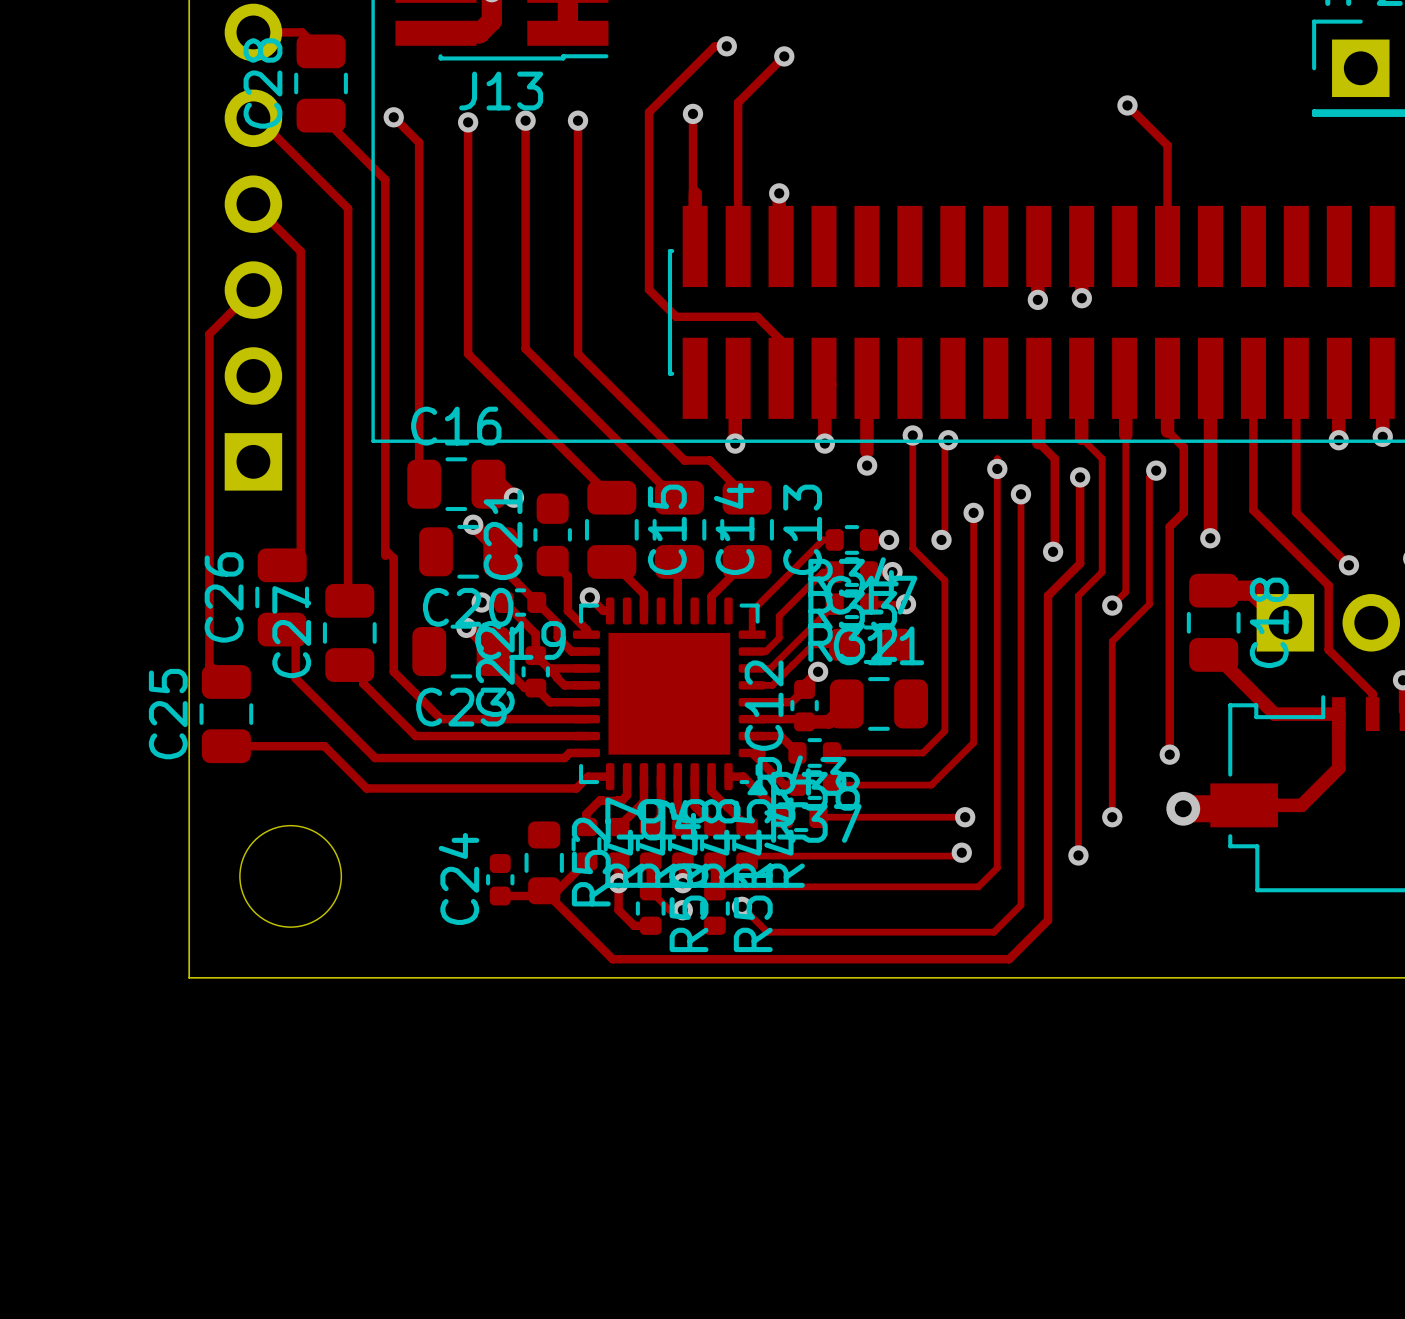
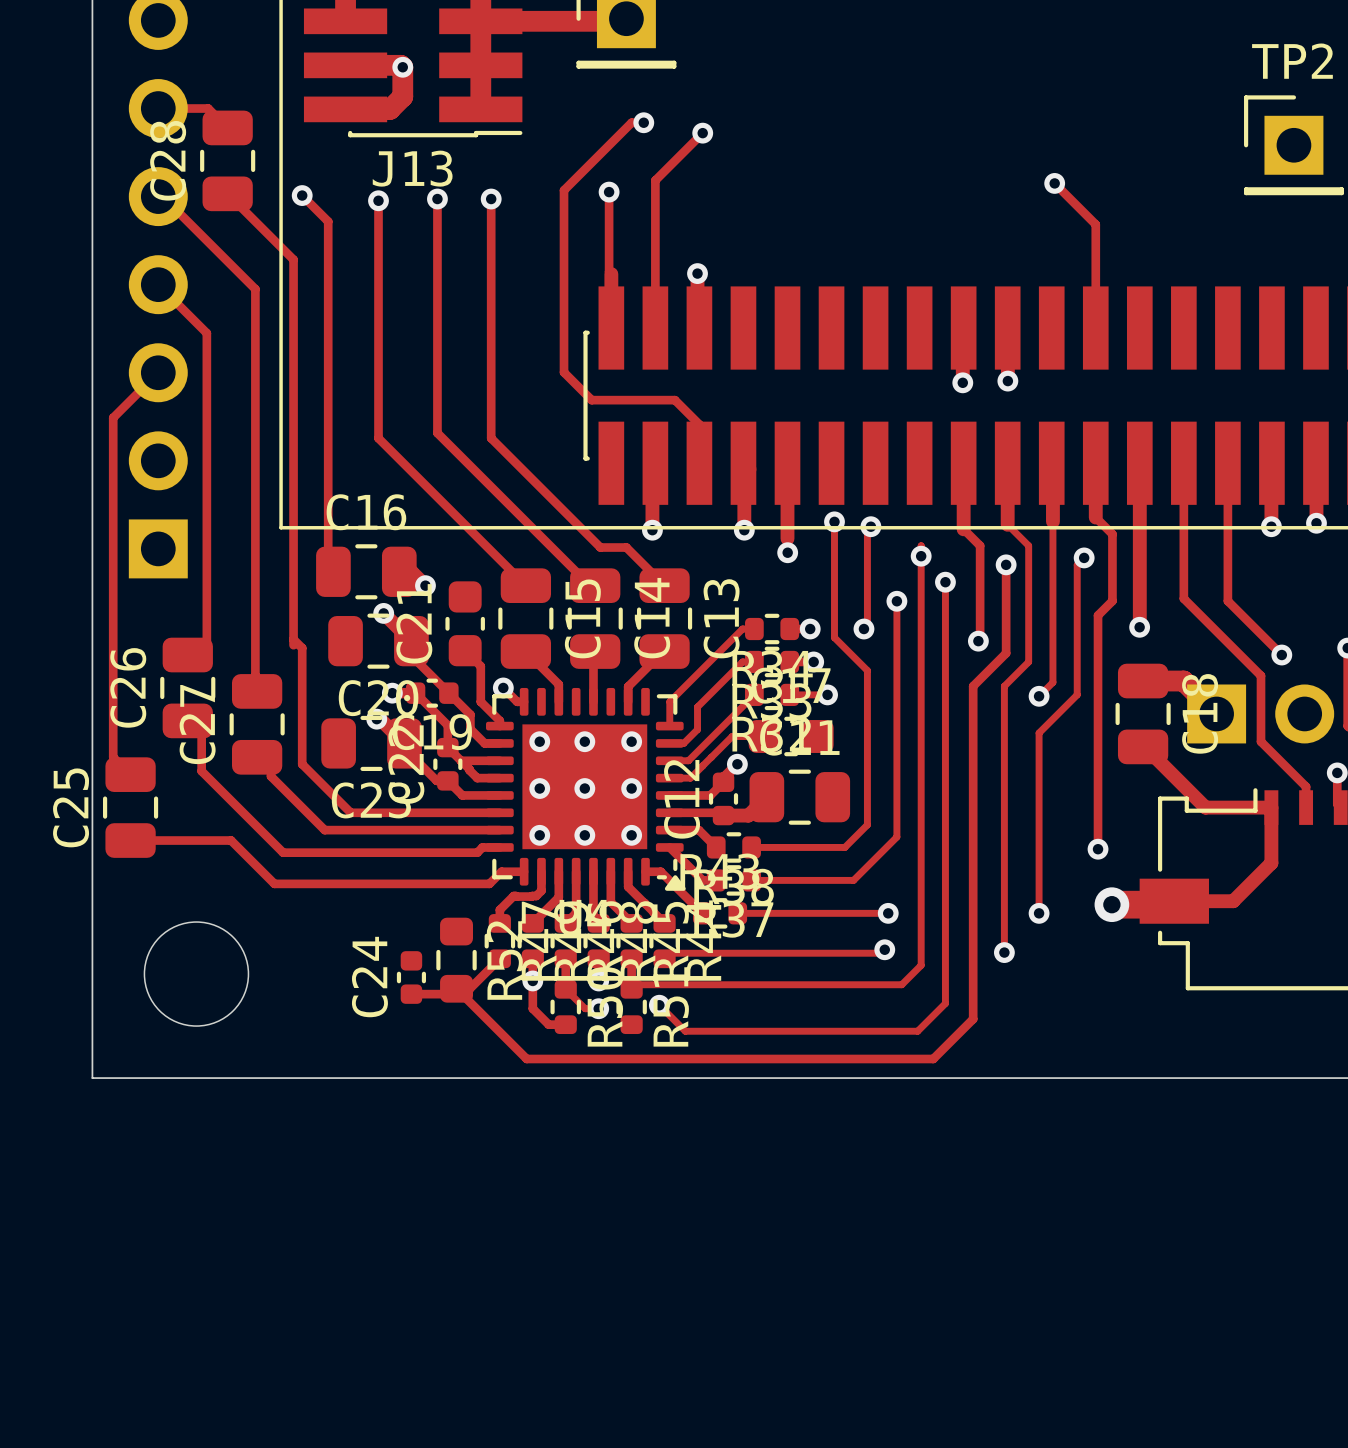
via: none -> (539, 741)
via: none -> (584, 741)
via: none -> (631, 741)
via: none -> (539, 788)
via: none -> (584, 788)
via: none -> (631, 788)
via: none -> (539, 835)
via: none -> (584, 835)
via: none -> (631, 835)

